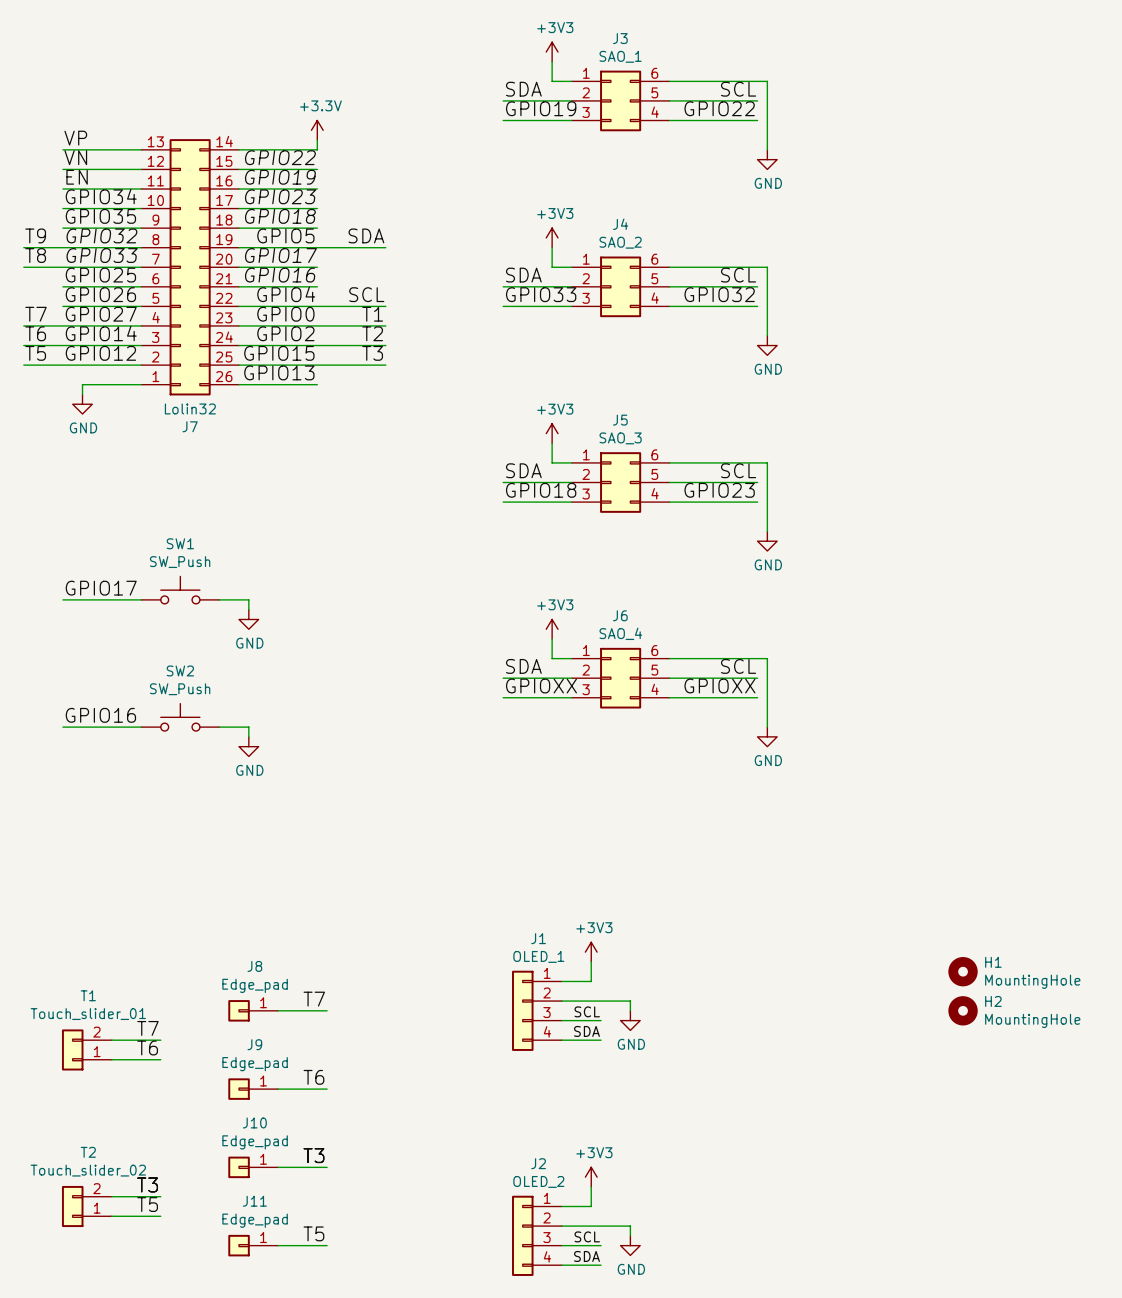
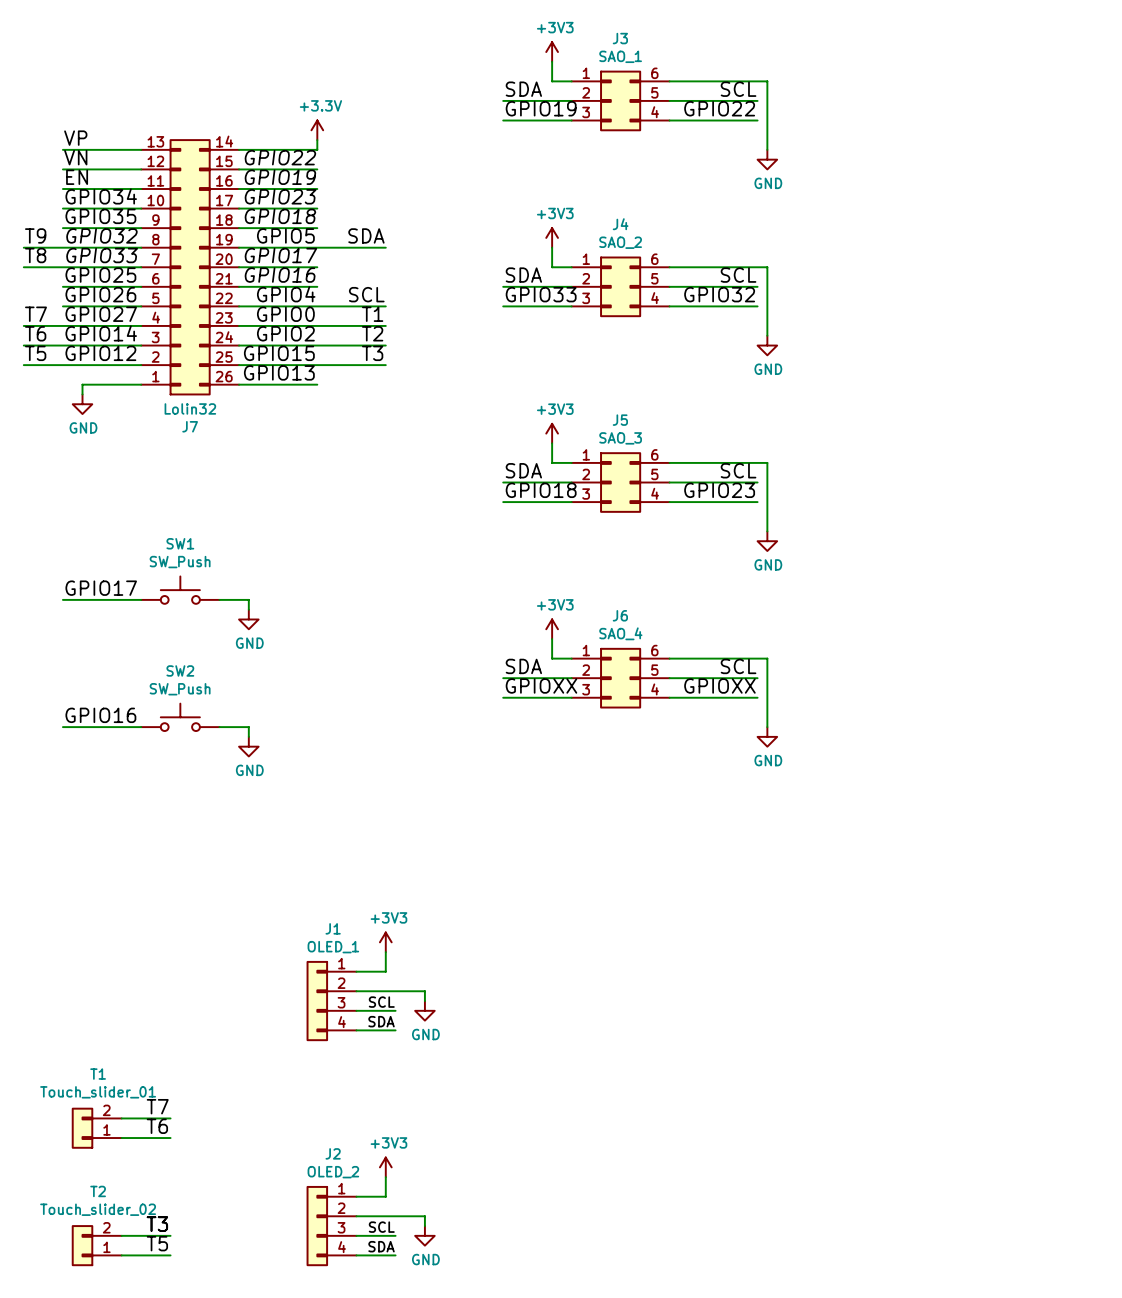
power symbol: none -> +3V3 (385, 942)
wire: none -> (385, 952) (385, 971) (356, 971)
power symbol: +3V3 (591, 952) -> none
wire: (591, 961) (591, 981) (561, 981) -> none
H1: MountingHole (963, 971) -> none
wire: none -> (356, 991) (424, 991) (424, 1001)
label: T7 (314, 999) -> none
wire: (561, 1001) (630, 1001) (630, 1010) -> none
label: none -> SCL (381, 1002)
J8: Edge_pad (253, 1010) -> none
wire: (278, 1010) (327, 1010) -> none
wire: none -> (356, 1010) (395, 1010)
power symbol: none -> GND (424, 1010)
J1 position: (536, 1010) -> (331, 1001)
H2: MountingHole (963, 1010) -> none
label: SCL (587, 1011) -> none
wire: (561, 1020) (601, 1020) -> none
power symbol: GND (630, 1020) -> none
label: none -> SDA (381, 1021)
label position: T7 (147, 1028) -> T7 (157, 1106)
wire: none -> (356, 1030) (395, 1030)
label: SDA (586, 1031) -> none
wire: (111, 1040) (160, 1040) -> (121, 1138) (170, 1138)
wire: (561, 1040) (601, 1040) -> none
label position: T6 (147, 1047) -> T6 (157, 1126)
T1 position: (86, 1049) -> (96, 1128)
wire: (111, 1059) (160, 1059) -> (121, 1118) (170, 1118)
label: T6 (313, 1077) -> none
J9: Edge_pad (253, 1089) -> none
wire: (278, 1089) (327, 1089) -> none
label: T3 (313, 1155) -> none
J10: Edge_pad (253, 1167) -> none
wire: (278, 1167) (327, 1167) -> none
power symbol: none -> +3V3 (385, 1167)
wire: none -> (385, 1177) (385, 1196) (356, 1196)
power symbol: +3V3 (591, 1177) -> none
label position: T3 (147, 1184) -> T3 (157, 1224)
wire: (591, 1186) (591, 1206) (561, 1206) -> none
wire: (111, 1196) (160, 1196) -> (121, 1235) (170, 1235)
label position: T5 (147, 1204) -> T5 (157, 1243)
T2 position: (86, 1206) -> (96, 1245)
wire: (111, 1216) (160, 1216) -> (121, 1255) (170, 1255)
wire: none -> (356, 1216) (424, 1216) (424, 1226)
wire: (561, 1226) (630, 1226) (630, 1235) -> none
label: none -> SCL (381, 1227)
label: T5 (313, 1233) -> none
wire: none -> (356, 1235) (395, 1235)
power symbol: none -> GND (424, 1235)
J2 position: (536, 1235) -> (331, 1226)
label: SCL (587, 1236) -> none
J11: Edge_pad (253, 1245) -> none
wire: (278, 1245) (327, 1245) -> none
wire: (561, 1245) (601, 1245) -> none
power symbol: GND (630, 1245) -> none
label: none -> SDA (381, 1246)
wire: none -> (356, 1255) (395, 1255)
label: SDA (586, 1256) -> none
wire: (561, 1265) (601, 1265) -> none

